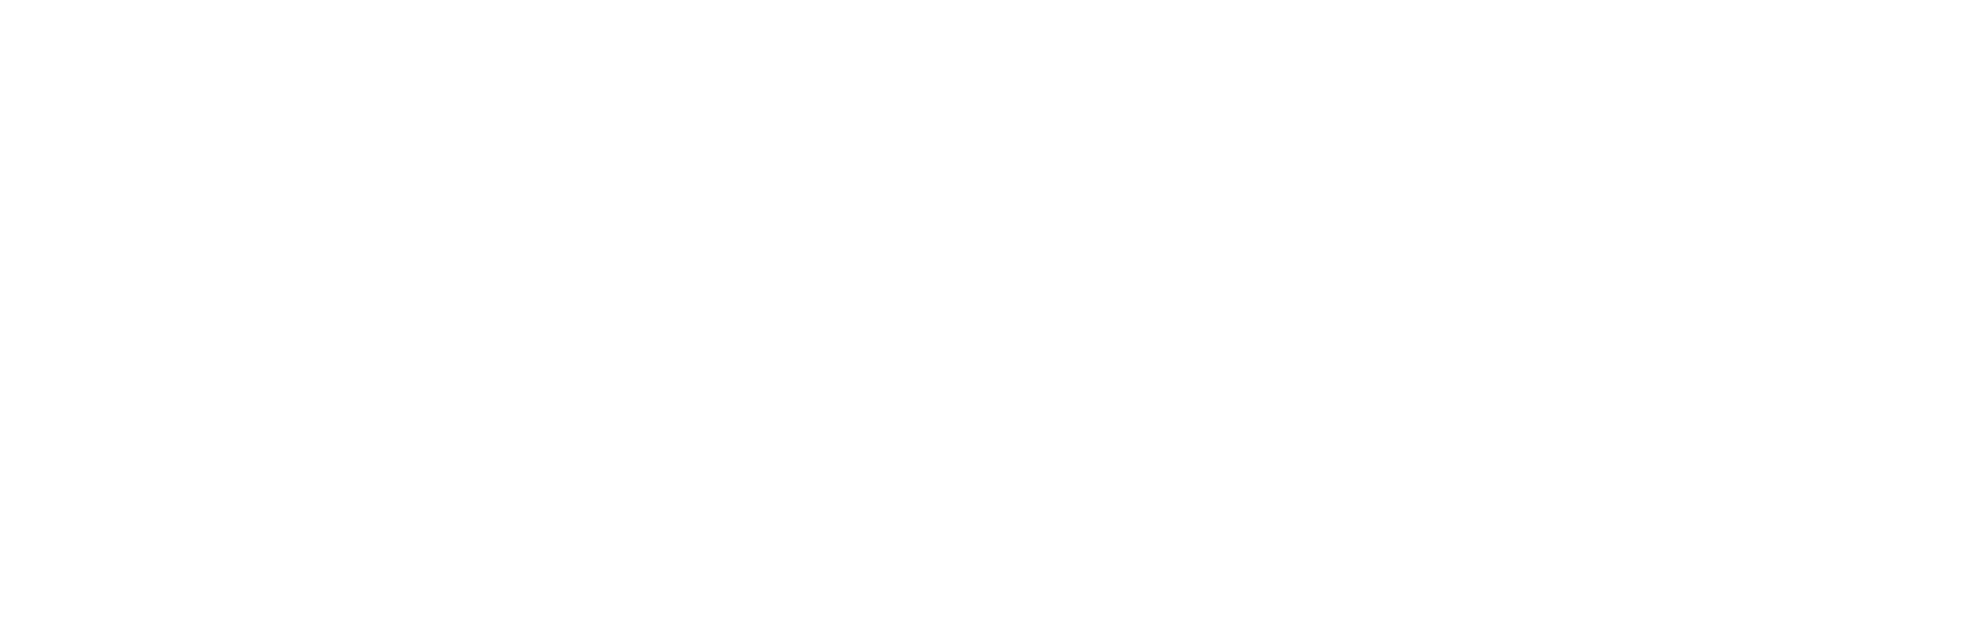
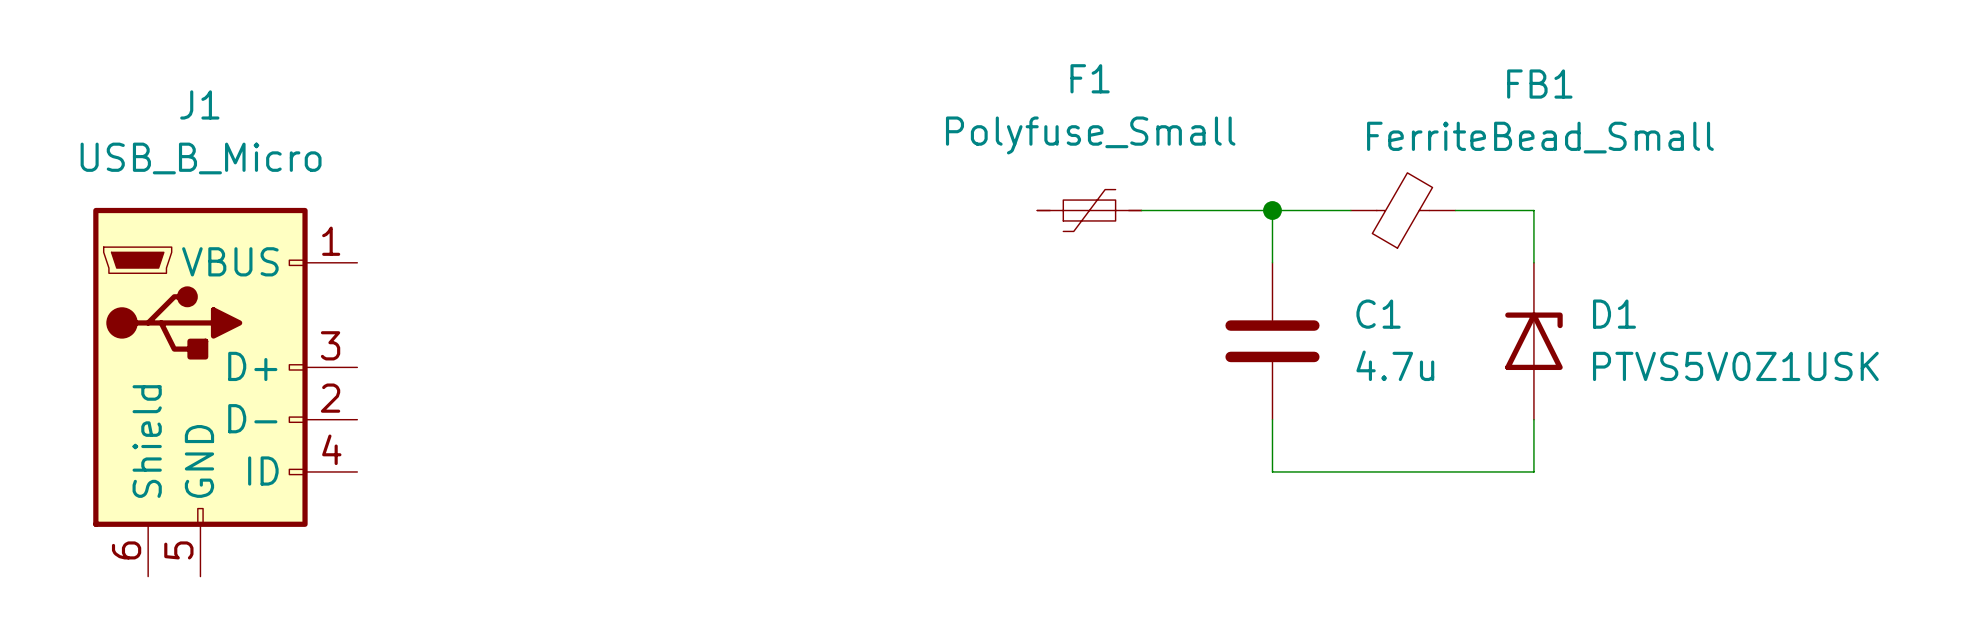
F1: none -> Polyfuse_Small (1089, 210)
wire: none -> (1141, 210) (1350, 210)
wire: none -> (1272, 210) (1272, 262)
junction: none -> (1272, 210)
FB1: none -> FerriteBead_Small (1403, 210)
wire: none -> (1455, 210) (1533, 210) (1533, 262)
C1: none -> 4.7u (1272, 341)
D1: none -> PTVS5V0Z1USK (1533, 341)
J1: none -> USB_B_Micro (225, 392)
wire: none -> (1272, 419) (1272, 471) (1533, 471) (1533, 419)

